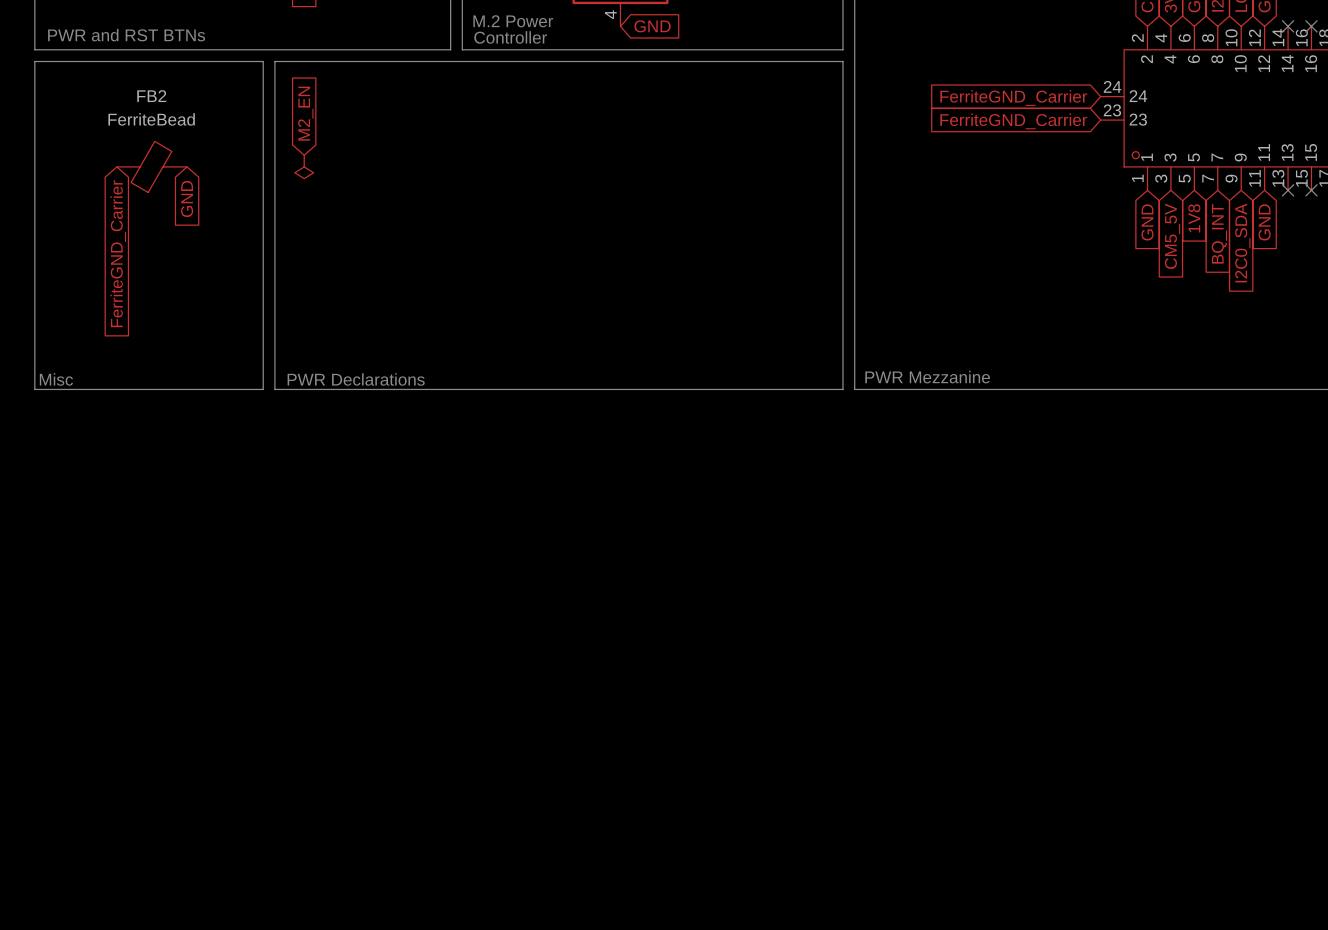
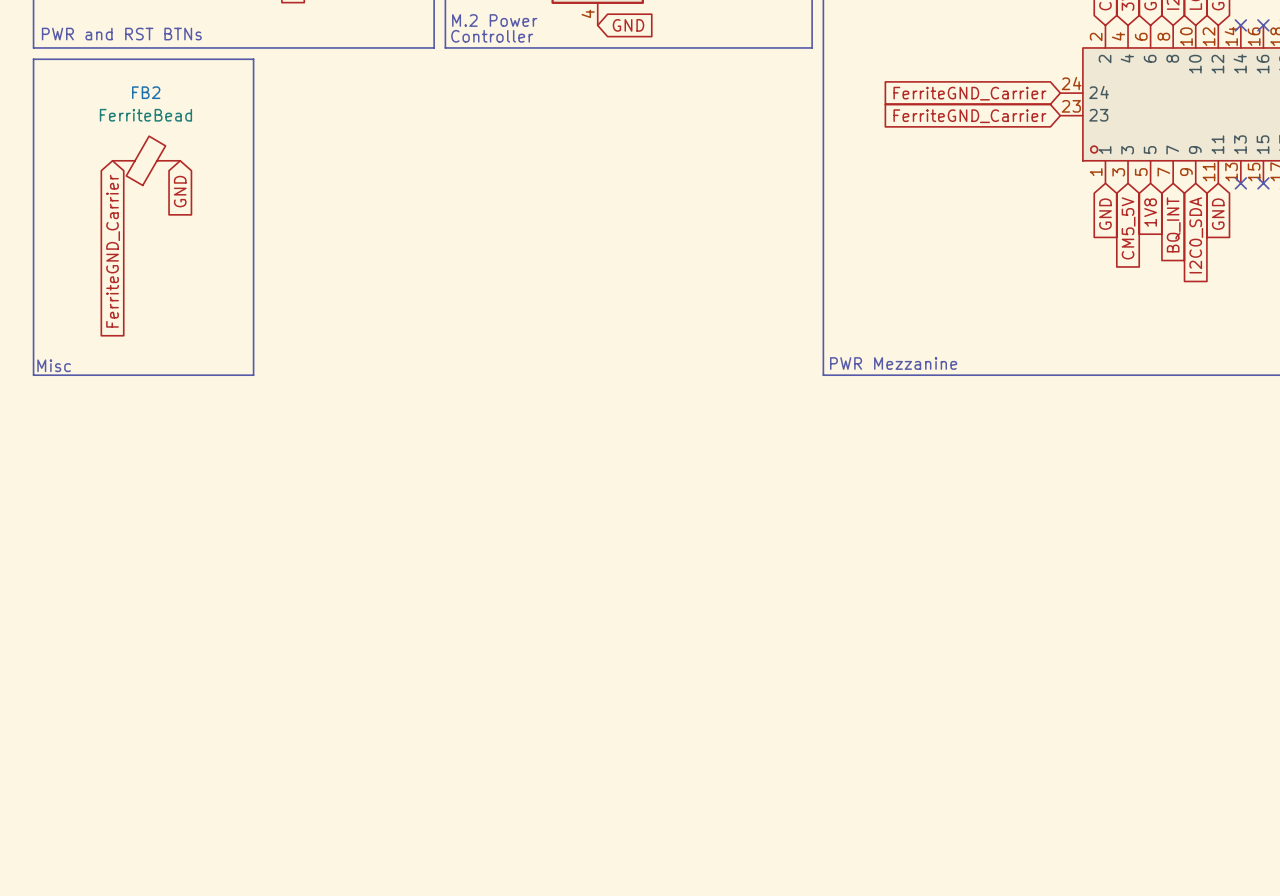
line: (274, 61) (842, 61) (842, 389) (274, 389) (274, 61) -> none
global label: M2_EN (305, 113) -> none
power symbol: (304, 166) -> none
text: PWR Declarations (356, 379) -> none

